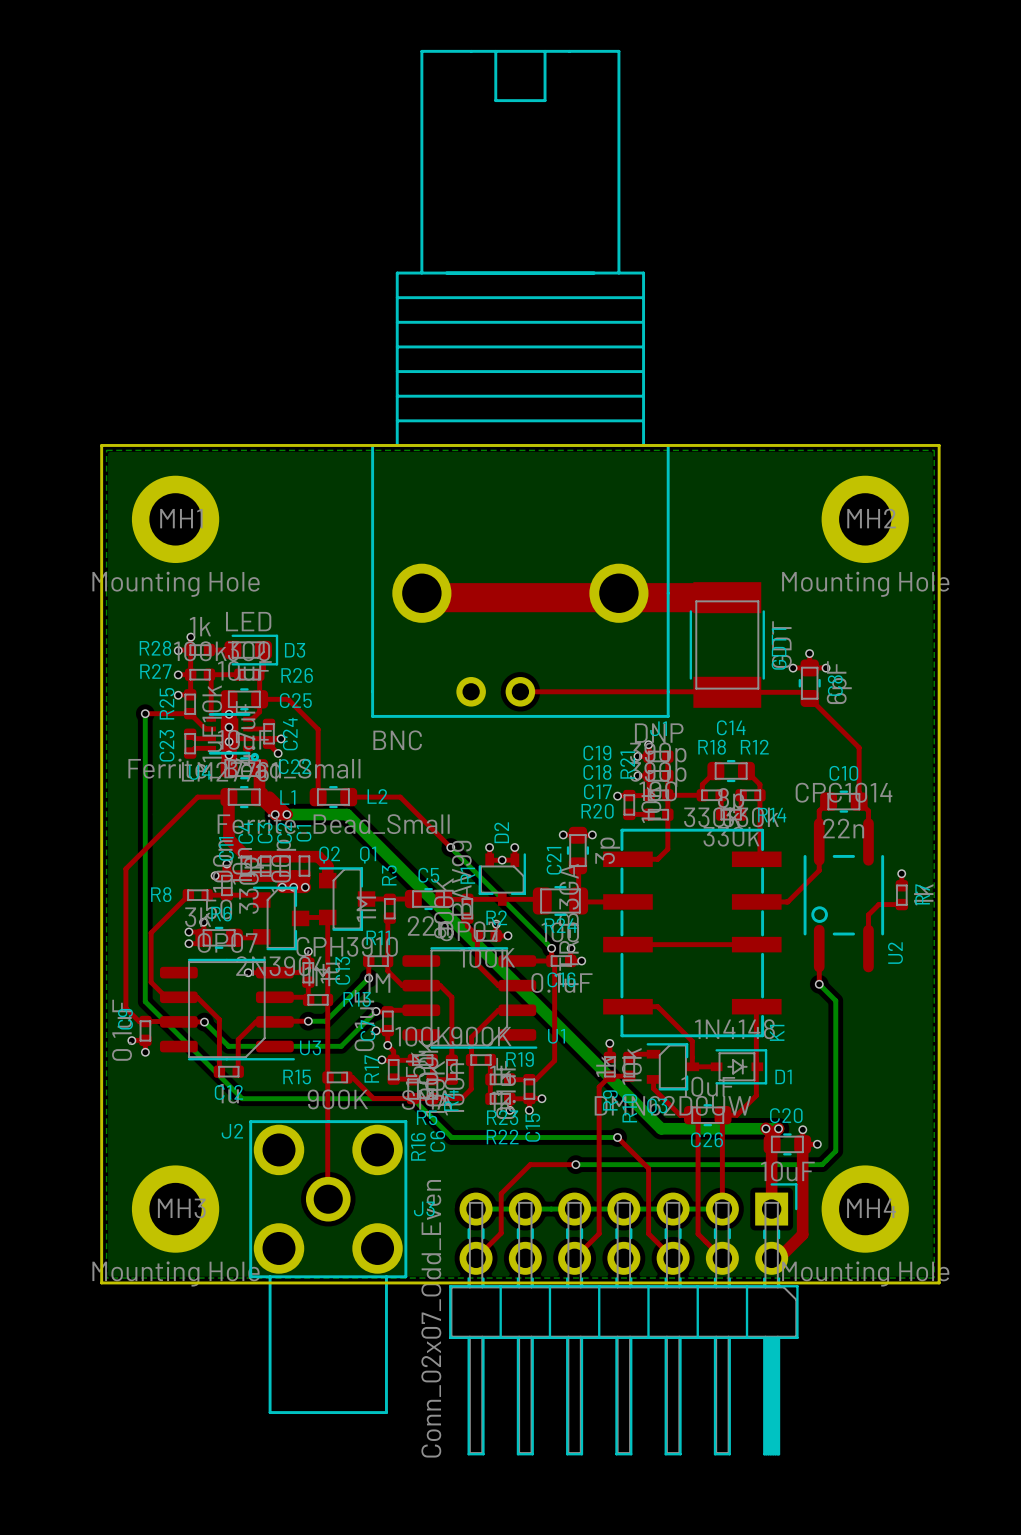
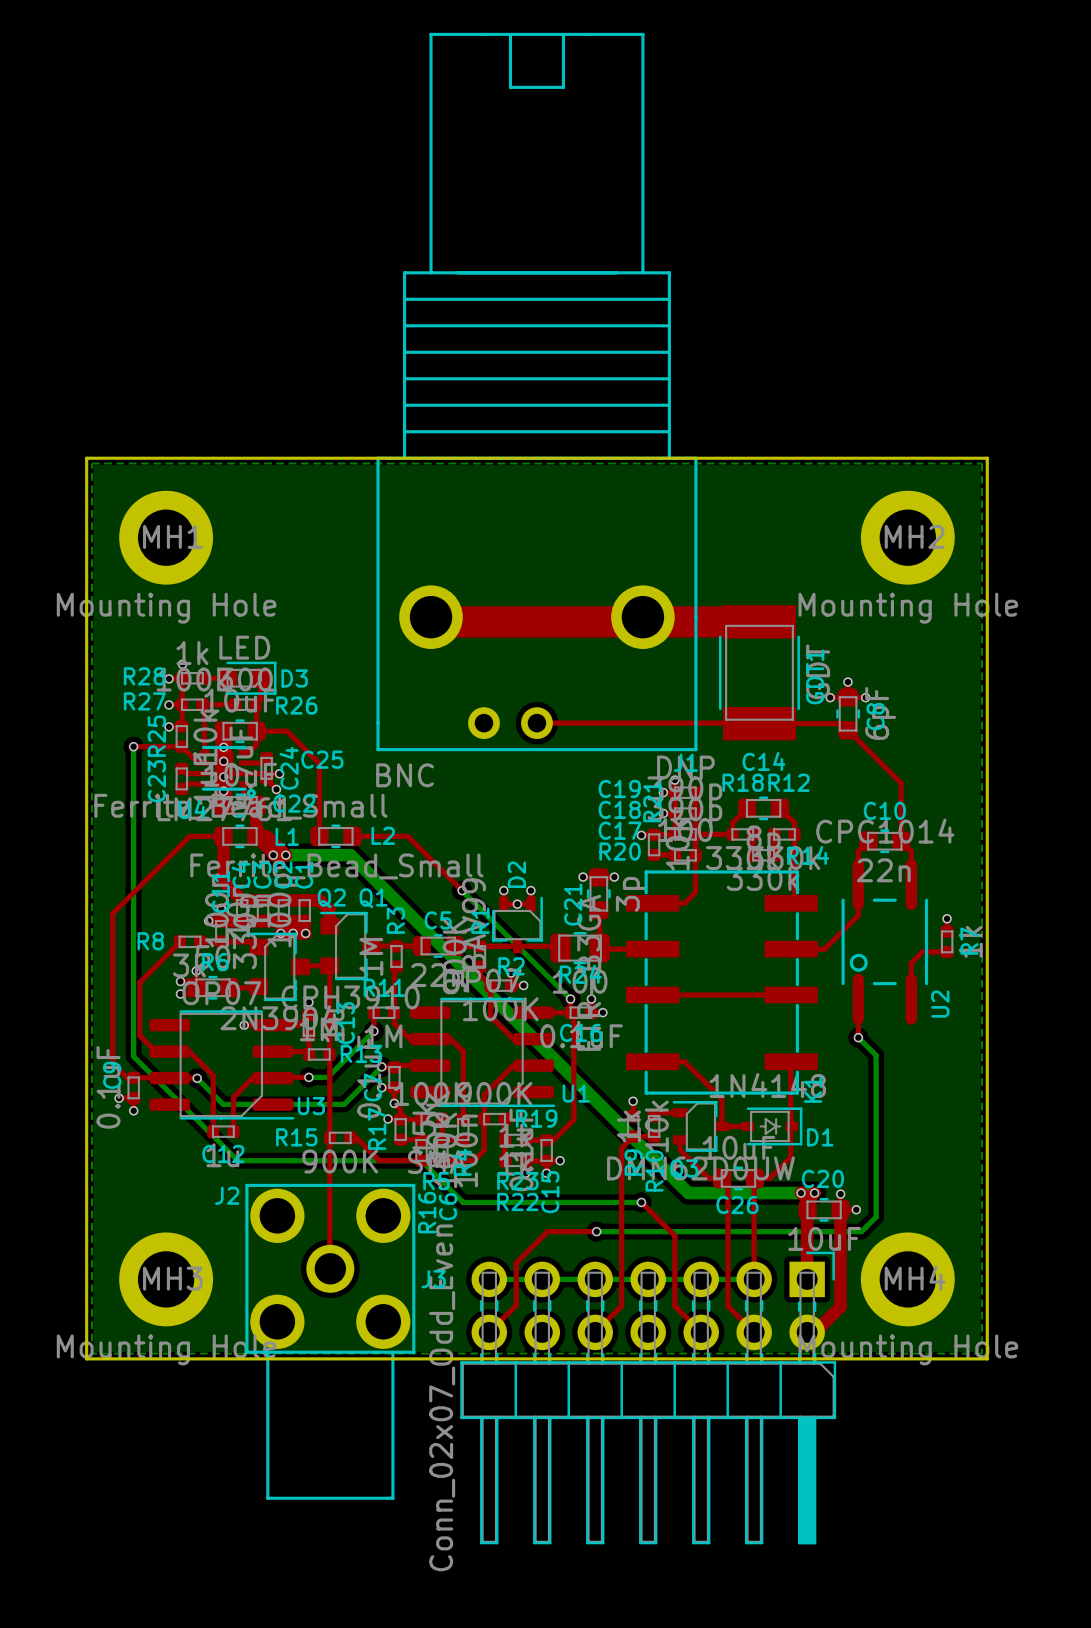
C25 name position: C25 (295, 700) -> C25 (322, 759)

